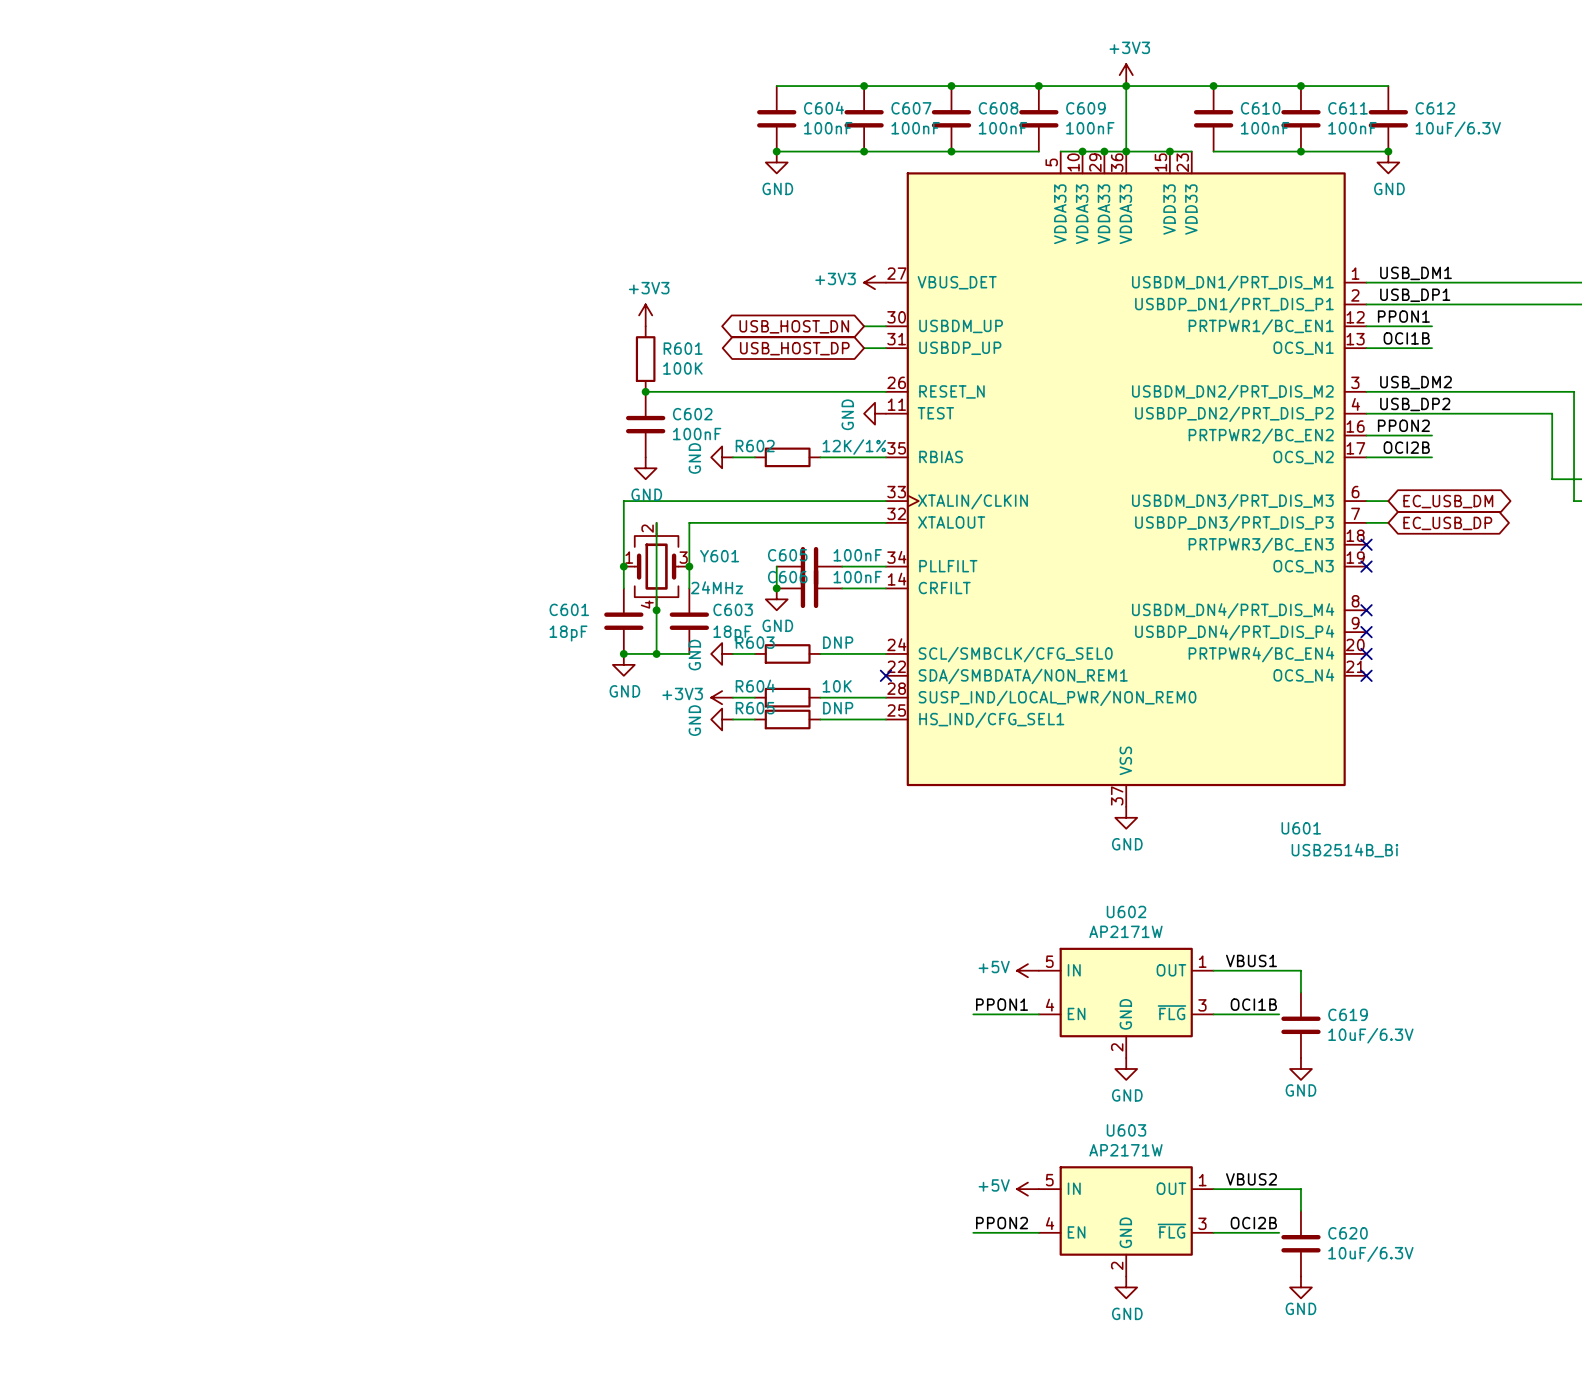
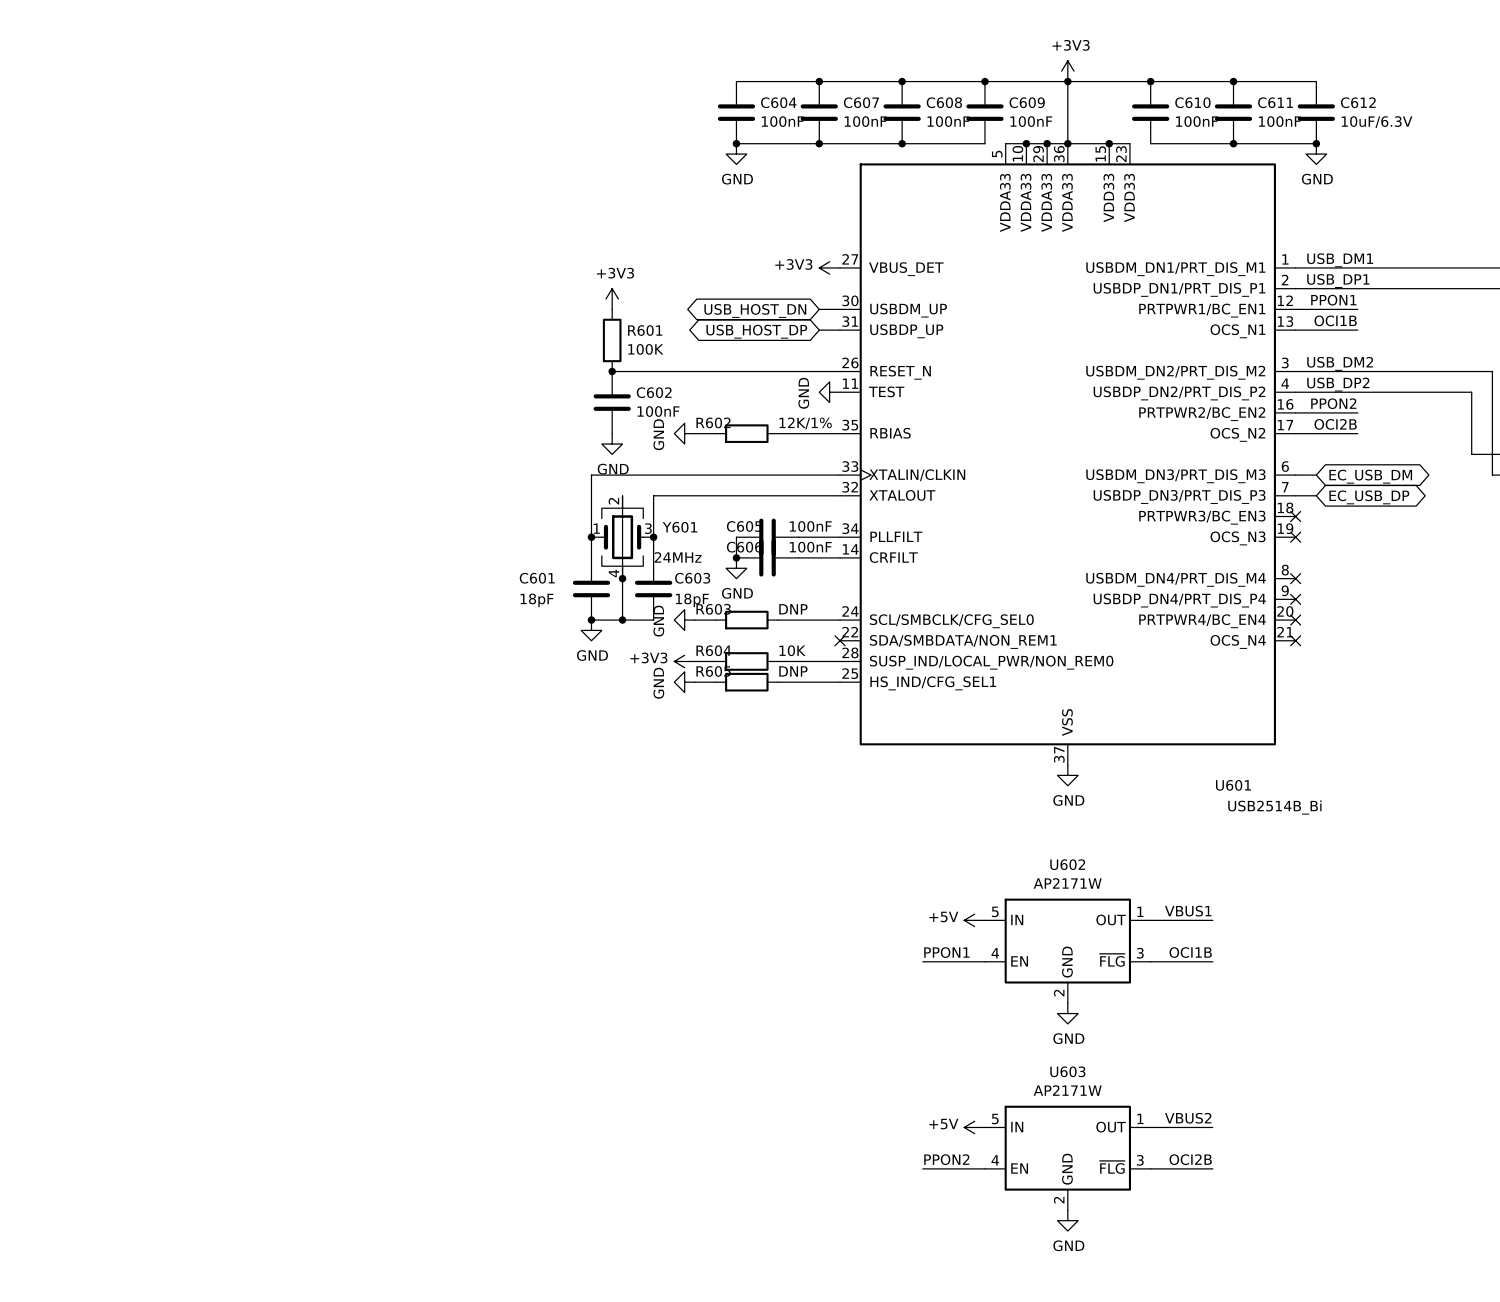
wire: (1279, 970) (1300, 970) (1300, 992) -> none
C619: 10uF/6.3V (1300, 1025) -> none
power symbol: GND (1300, 1068) -> none
wire: (1279, 1189) (1300, 1189) (1300, 1210) -> none
C620: 10uF/6.3V (1300, 1243) -> none
power symbol: GND (1300, 1287) -> none

